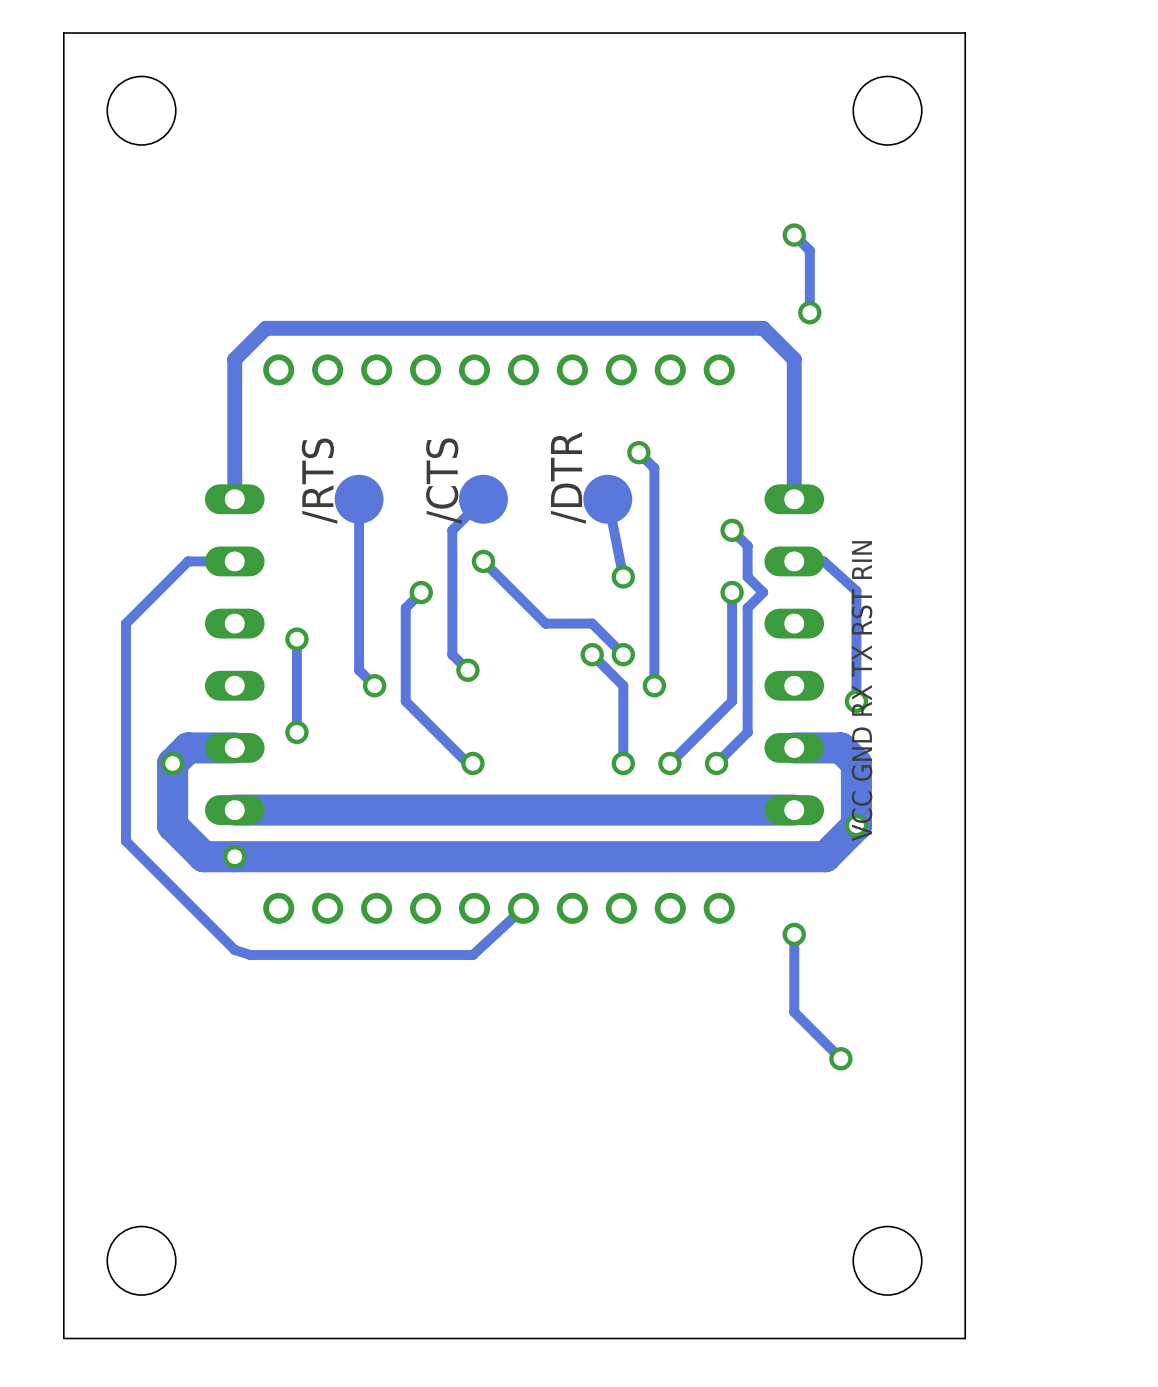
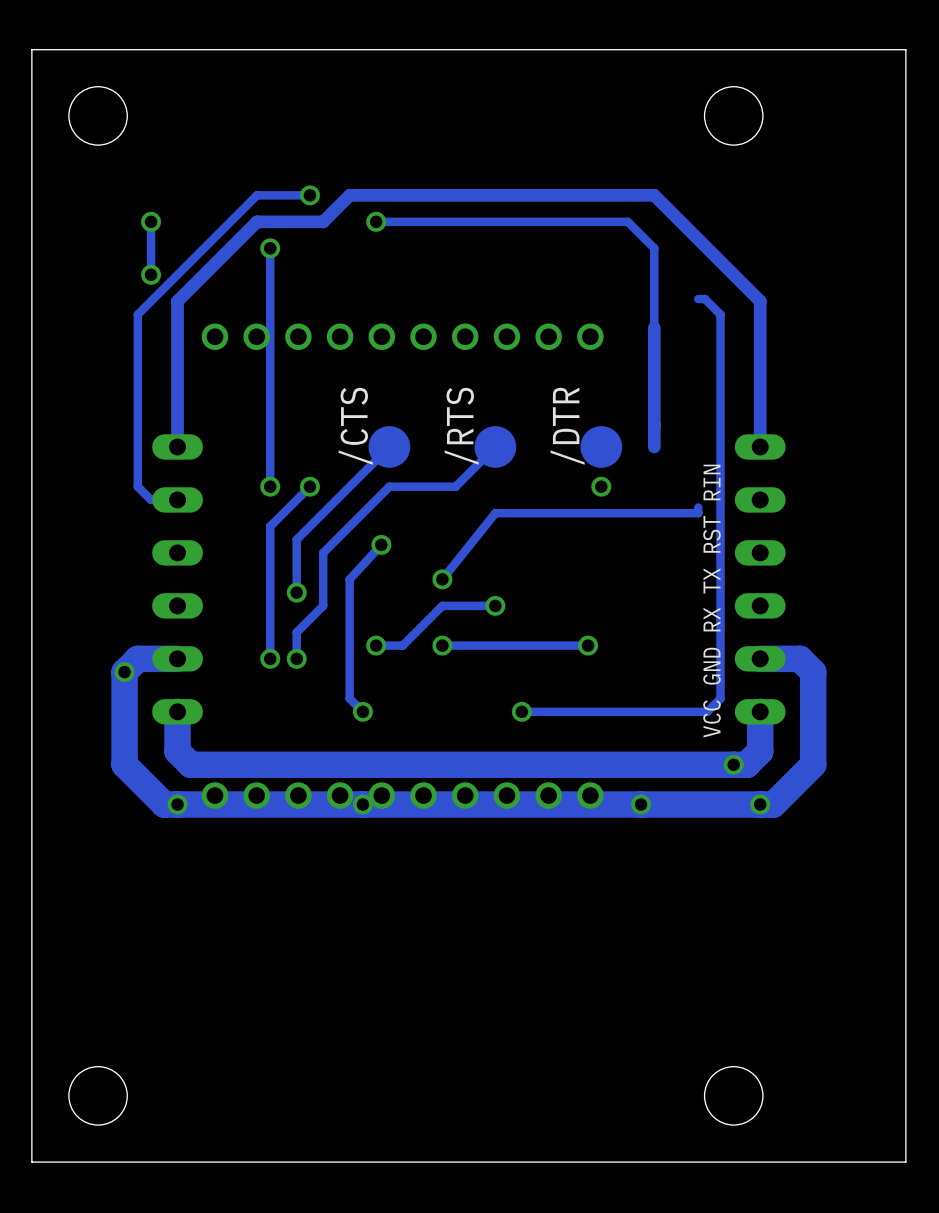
board edge: (965, 33) (965, 1338) -> (799, 49) (905, 49) (905, 1162) (799, 1162)
via: none -> (309, 195)
track: none -> (151, 221) (151, 274)
via: none -> (151, 221)
track: none -> (376, 221) (627, 221) (654, 248) (654, 327)
via: none -> (376, 221)
track: (794, 235) (809, 250) (809, 312) -> none
via: (794, 235) -> none
track: none -> (270, 248) (270, 486)
via: none -> (270, 248)
via: none -> (151, 274)
via: (809, 312) -> none
track: none -> (698, 299) (704, 299) (720, 314) (720, 698) (707, 711) (654, 711)
track: (794, 359) (763, 328) (265, 328) (234, 359) -> (760, 446) (760, 301) (654, 195) (349, 195) (323, 221) (256, 221) (177, 301) (177, 327)
track: (638, 452) (654, 468) (654, 685) -> none
via: (638, 452) -> none
/DTR name: /DTR (568, 478) -> /RTS (461, 426)
track: (359, 499) (359, 670) (374, 685) -> none
/RTS: (359, 499) -> none
track: (607, 499) (623, 576) -> none
/DTR: none -> (601, 446)
track: (452, 530) (452, 654) (467, 670) -> (362, 473) (296, 539) (296, 592)
track: (732, 530) (747, 545) (747, 576) (763, 592) (747, 608) (747, 732) (716, 763) -> none
via position: (732, 530) -> (601, 486)
via: none -> (270, 486)
track: none -> (309, 486) (270, 526) (270, 658)
via: none -> (309, 486)
track: (203, 561) (188, 561) (125, 623) (125, 841) (234, 949) (250, 954) (472, 954) (523, 908) -> (151, 499) (137, 486) (137, 314) (256, 195) (309, 195)
track: (483, 561) (545, 623) (592, 623) (623, 654) -> none
via: (483, 561) -> none
track: (794, 561) (823, 561) (856, 590) (856, 701) -> none
track: none -> (698, 507) (698, 513) (495, 513) (442, 579)
via: (623, 576) -> none
track: (421, 592) (405, 608) (405, 623) -> (495, 446) (455, 486) (389, 486) (323, 552)
via: (421, 592) -> none
track: (732, 592) (732, 701) (669, 763) -> none
via: (732, 592) -> none
track: none -> (381, 544) (349, 579) (349, 698) (362, 711)
via: none -> (381, 544)
track: (296, 639) (296, 732) -> none
via: (296, 639) -> none
via: none -> (442, 579)
track: (592, 654) (623, 685) (623, 763) -> none
via: (592, 654) -> none
via: (623, 654) -> none
part position: (794, 654) -> (760, 579)
via: (467, 670) -> none
via position: (374, 685) -> (296, 592)
track: (405, 685) (405, 701) (467, 763) (472, 763) -> (323, 605) (296, 632) (296, 658)
track: none -> (495, 605) (442, 605) (402, 645) (376, 645)
via: none -> (495, 605)
via: (654, 685) -> none
via: (856, 701) -> none
via: (296, 732) -> none
via: none -> (376, 645)
via: none -> (442, 645)
track: none -> (588, 645) (442, 645)
via: none -> (588, 645)
via: none -> (270, 658)
via: none -> (296, 658)
track: (794, 747) (840, 747) (856, 763) (856, 825) (825, 856) (203, 856) (172, 825) -> (773, 804) (164, 804) (124, 764) (124, 725)
track: none -> (760, 658) (799, 658) (813, 672) (813, 764) (773, 804)
via: (472, 763) -> none
via: (623, 763) -> none
via: (669, 763) -> none
via: (716, 763) -> none
via: none -> (362, 711)
track: (638, 810) (234, 810) -> (733, 764) (760, 738) (760, 711) (760, 751) (746, 764) (190, 764) (177, 751) (177, 711)
via: none -> (521, 711)
track width: thick (794, 810) (638, 810) -> thin (654, 711) (521, 711)
via: (856, 825) -> none
via position: (234, 856) -> (177, 804)
via: none -> (733, 764)
via: none -> (362, 804)
via: none -> (760, 804)
track: (794, 934) (794, 1012) (840, 1058) -> none
via position: (794, 934) -> (641, 804)
via: (840, 1058) -> none

